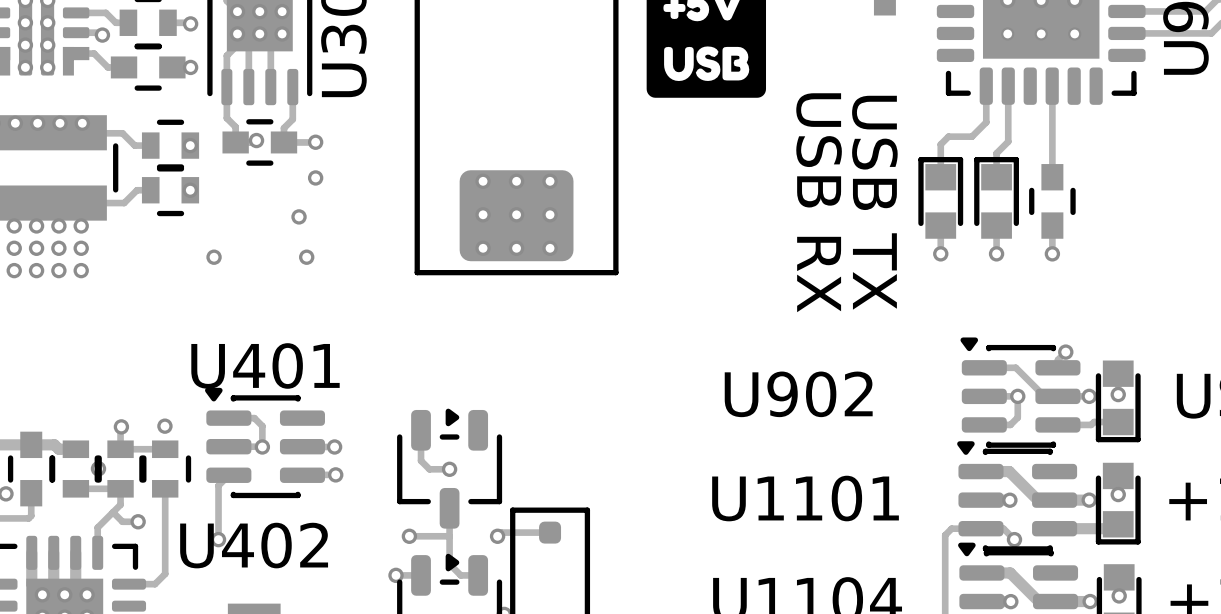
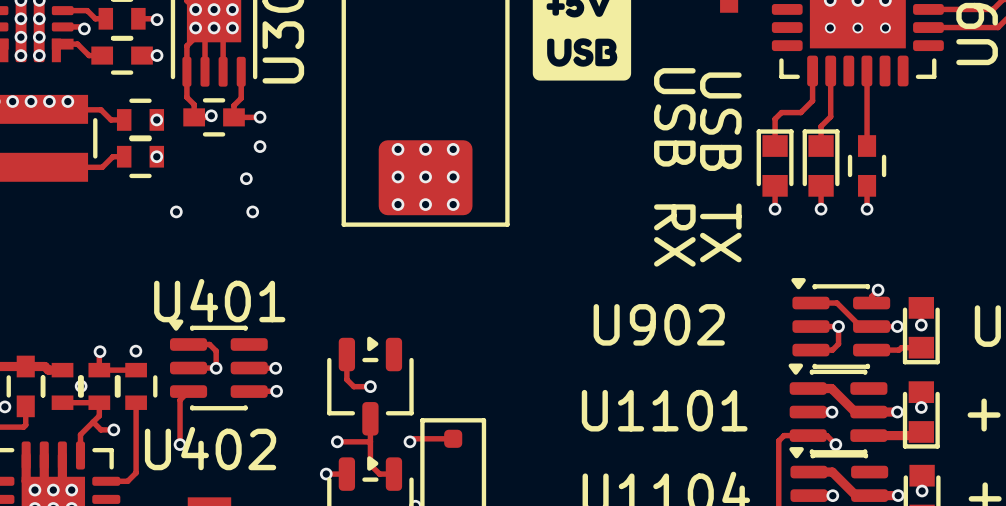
via: (14, 225) -> none
via: (36, 225) -> none
via: (58, 225) -> none
via: (81, 225) -> none
via: (14, 248) -> none
via: (36, 248) -> none
via: (58, 248) -> none
via: (81, 248) -> none
via: (14, 270) -> none
via: (36, 270) -> none
via: (58, 270) -> none
via: (81, 270) -> none

